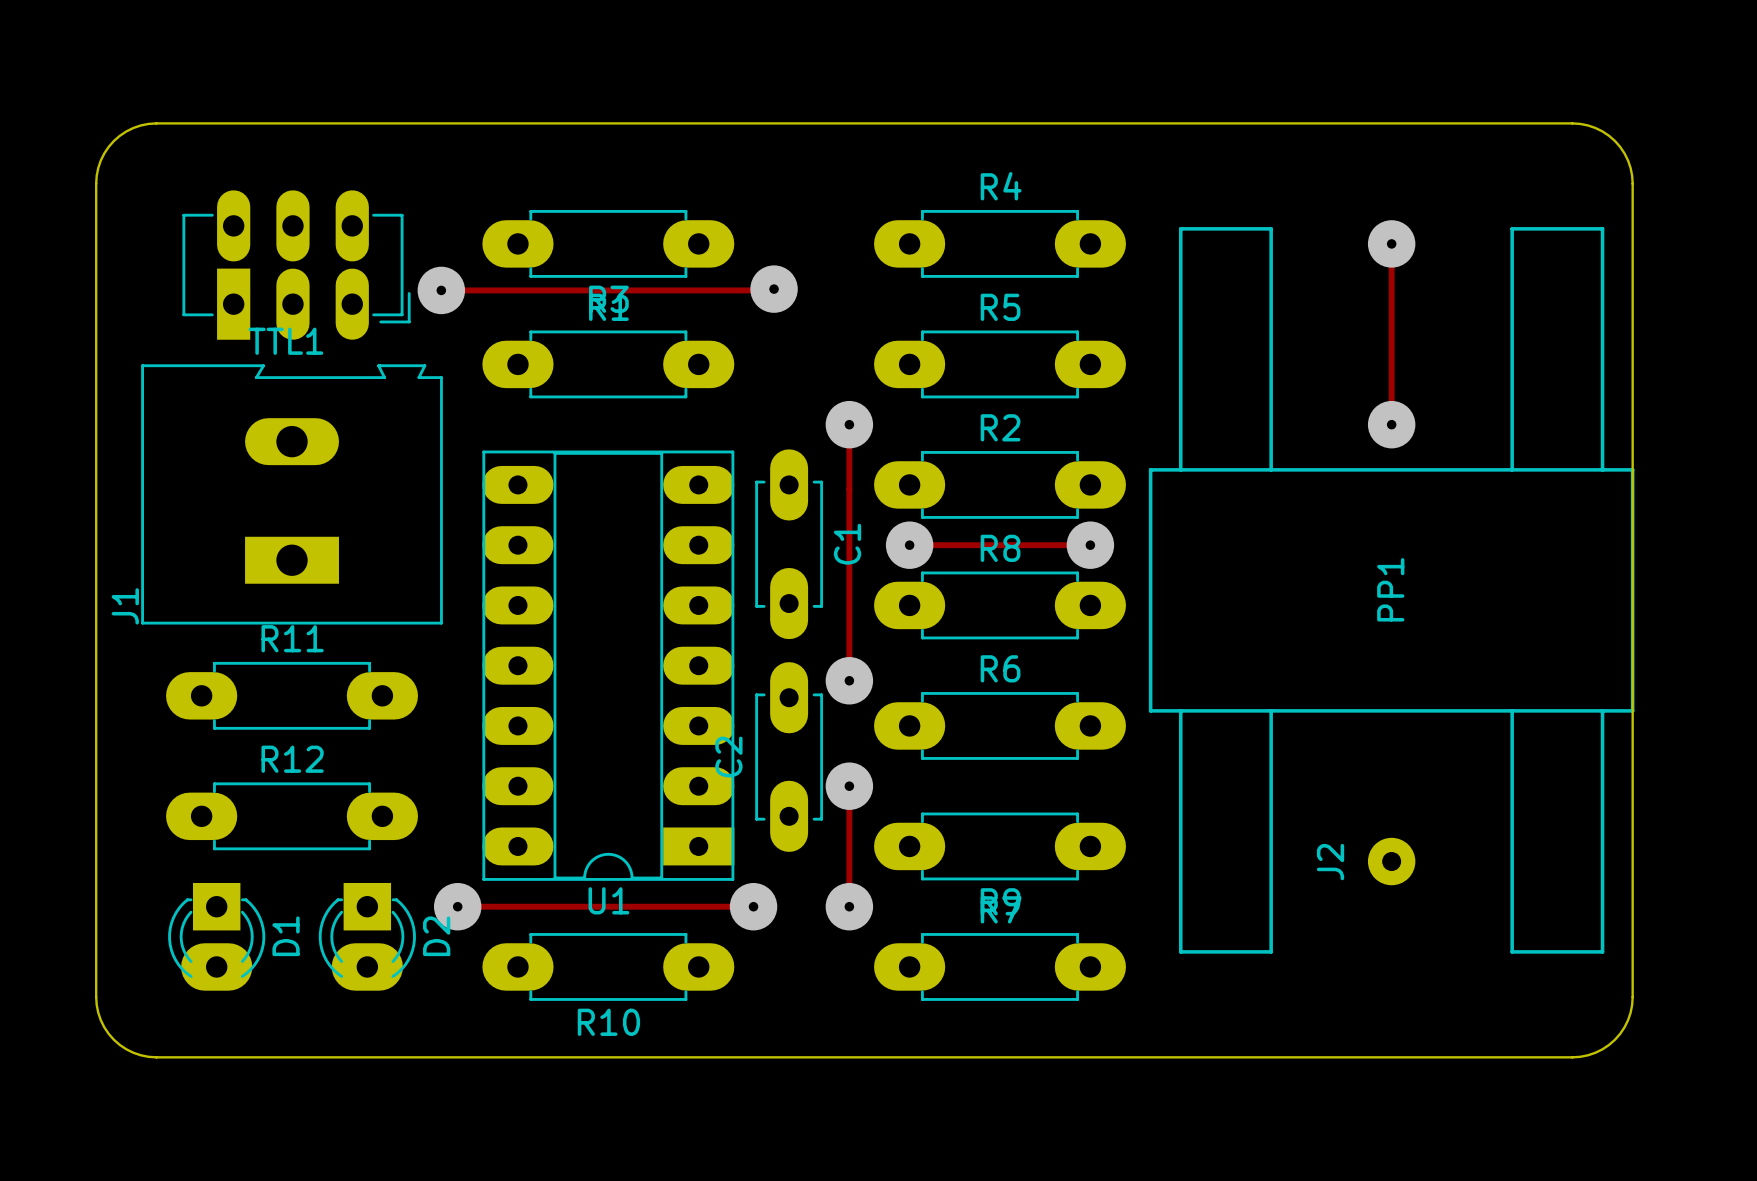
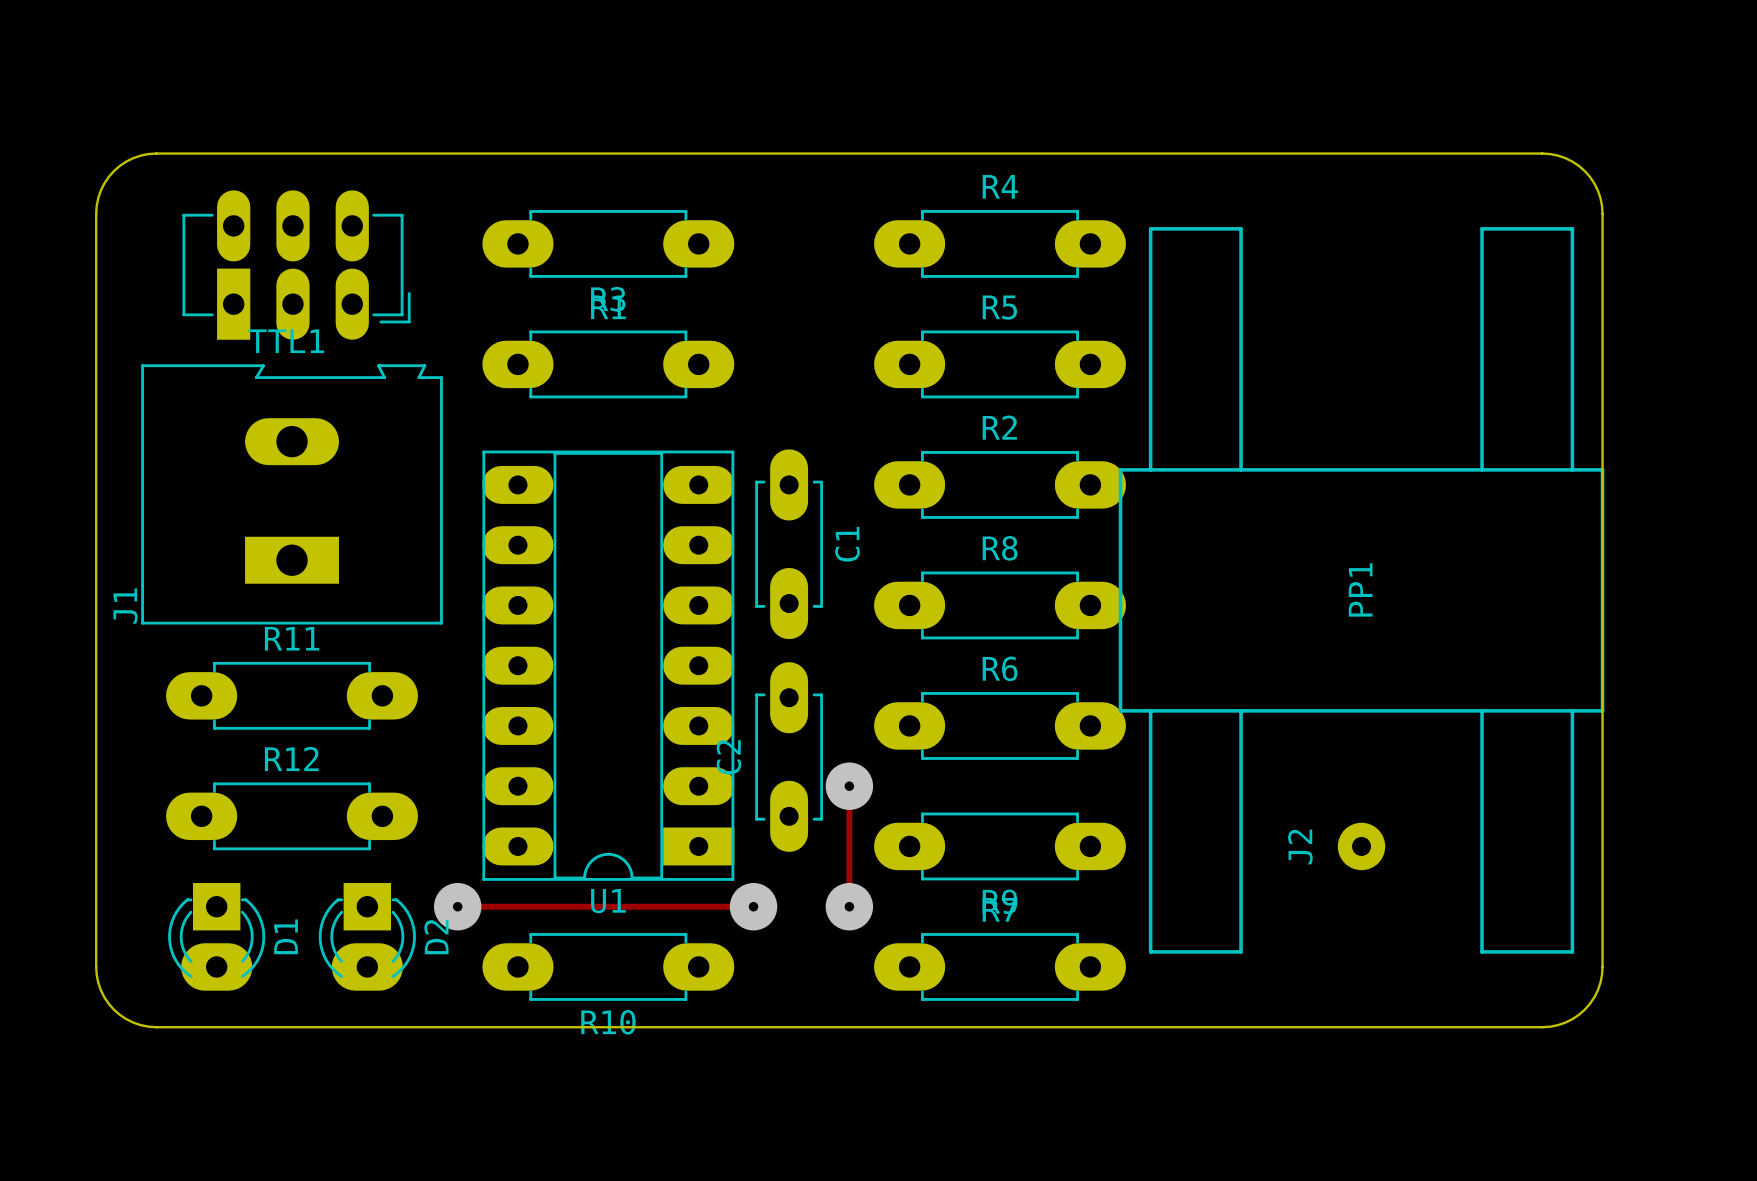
board edge: (96, 213) (96, 175) (104, 153) (113, 141) (126, 131) (140, 125) (156, 123) (1572, 123) (1595, 127) (1615, 141) (1628, 160) (1632, 183) (1632, 997) (1630, 1012) (1624, 1027) (1615, 1039) (1602, 1049) (1588, 1055) (1572, 1057) (156, 1057) (140, 1055) (126, 1049) (113, 1039) (104, 1027) (96, 1004) (96, 966) -> (96, 213) (100, 190) (113, 171) (133, 158) (156, 153) (1542, 153) (1557, 155) (1572, 161) (1584, 171) (1594, 183) (1600, 198) (1602, 213) (1602, 966) (1597, 990) (1584, 1009) (1565, 1022) (1542, 1027) (156, 1027) (133, 1022) (113, 1009) (100, 990) (96, 966)
track: (1391, 243) (1391, 424) -> none
via: (1391, 243) -> none
track: (774, 289) (441, 290) -> none
via: (774, 289) -> none
via: (441, 290) -> none
track: (849, 424) (849, 680) -> none
via: (849, 424) -> none
via: (1391, 424) -> none
track: (909, 545) (1090, 545) -> none
via: (909, 545) -> none
via: (1090, 545) -> none
PP1 position: (1391, 590) -> (1361, 590)
via: (849, 680) -> none
J2 position: (1391, 861) -> (1361, 846)

